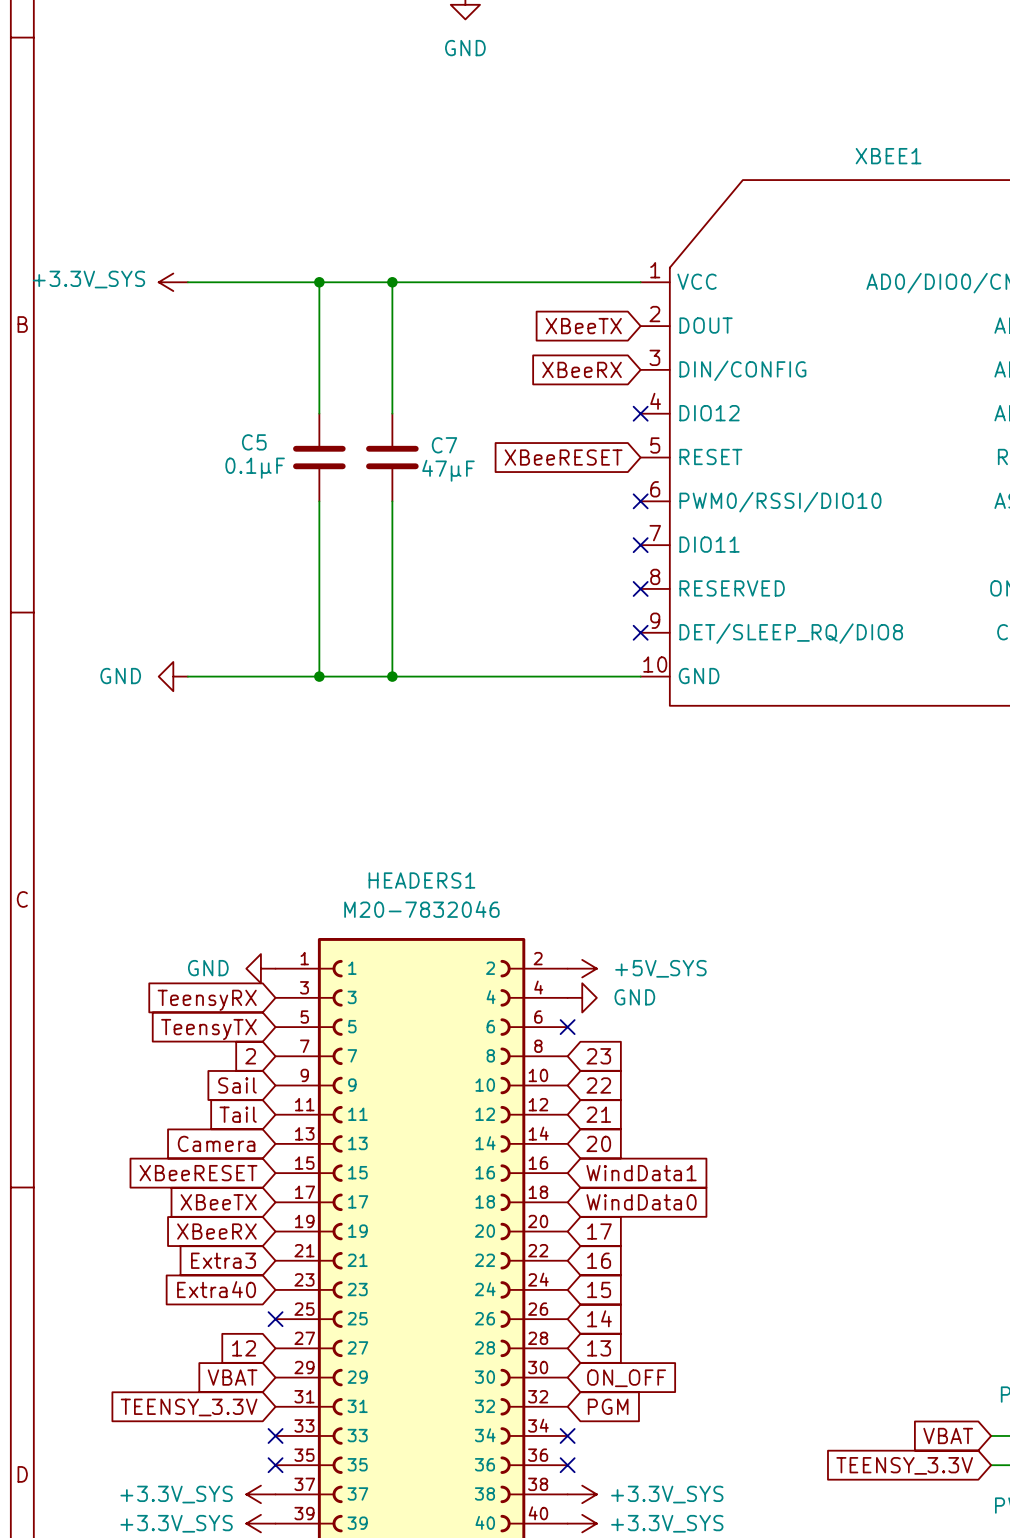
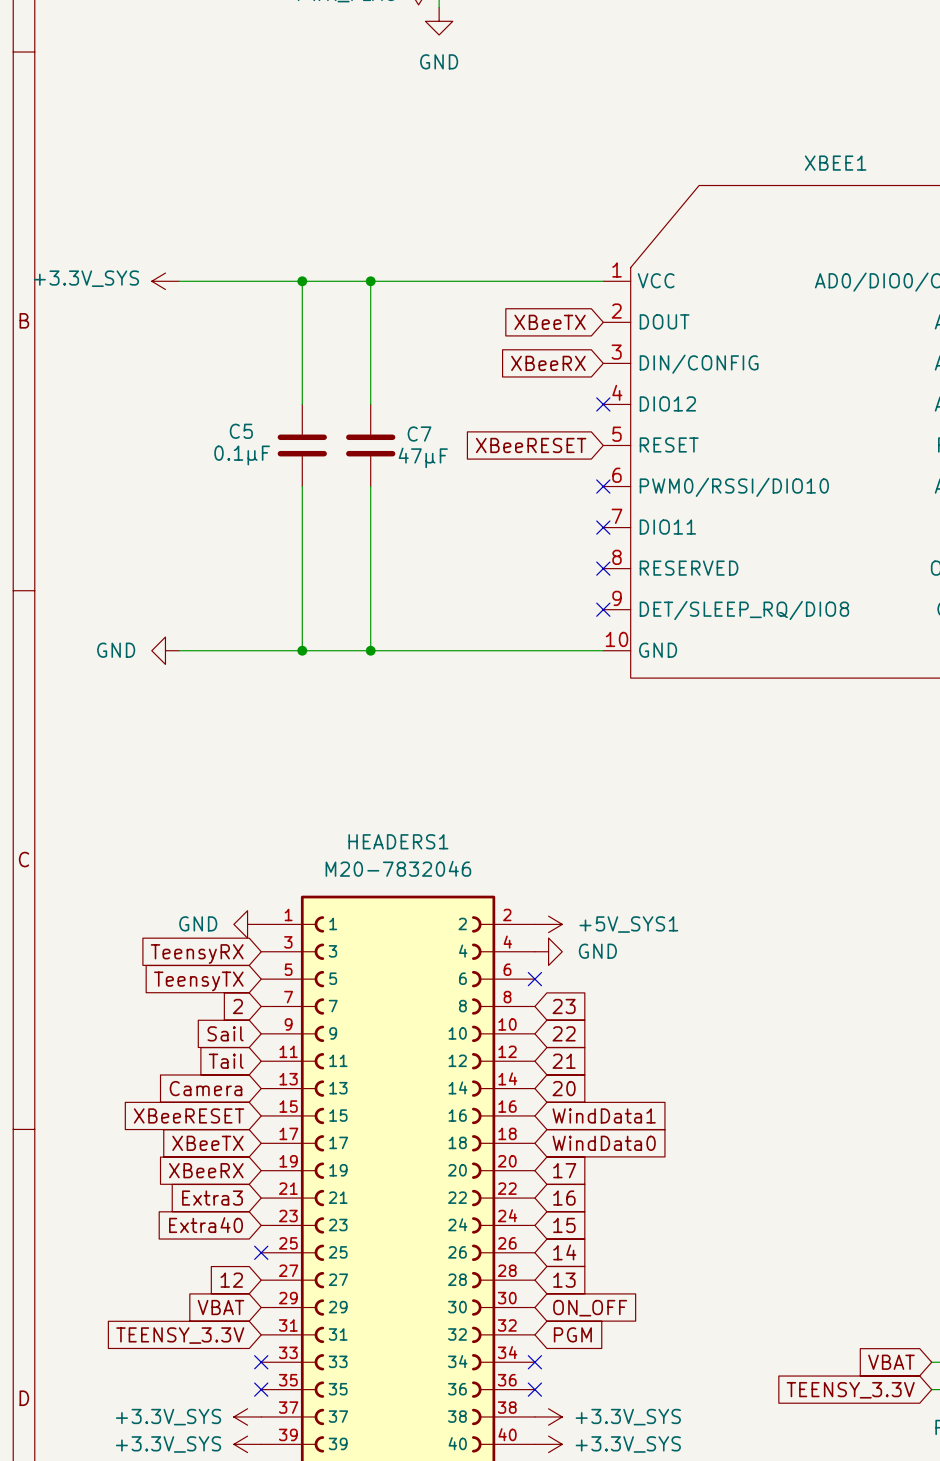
power symbol: +5V_SYS (582, 968) -> +5V_SYS1 (548, 924)

